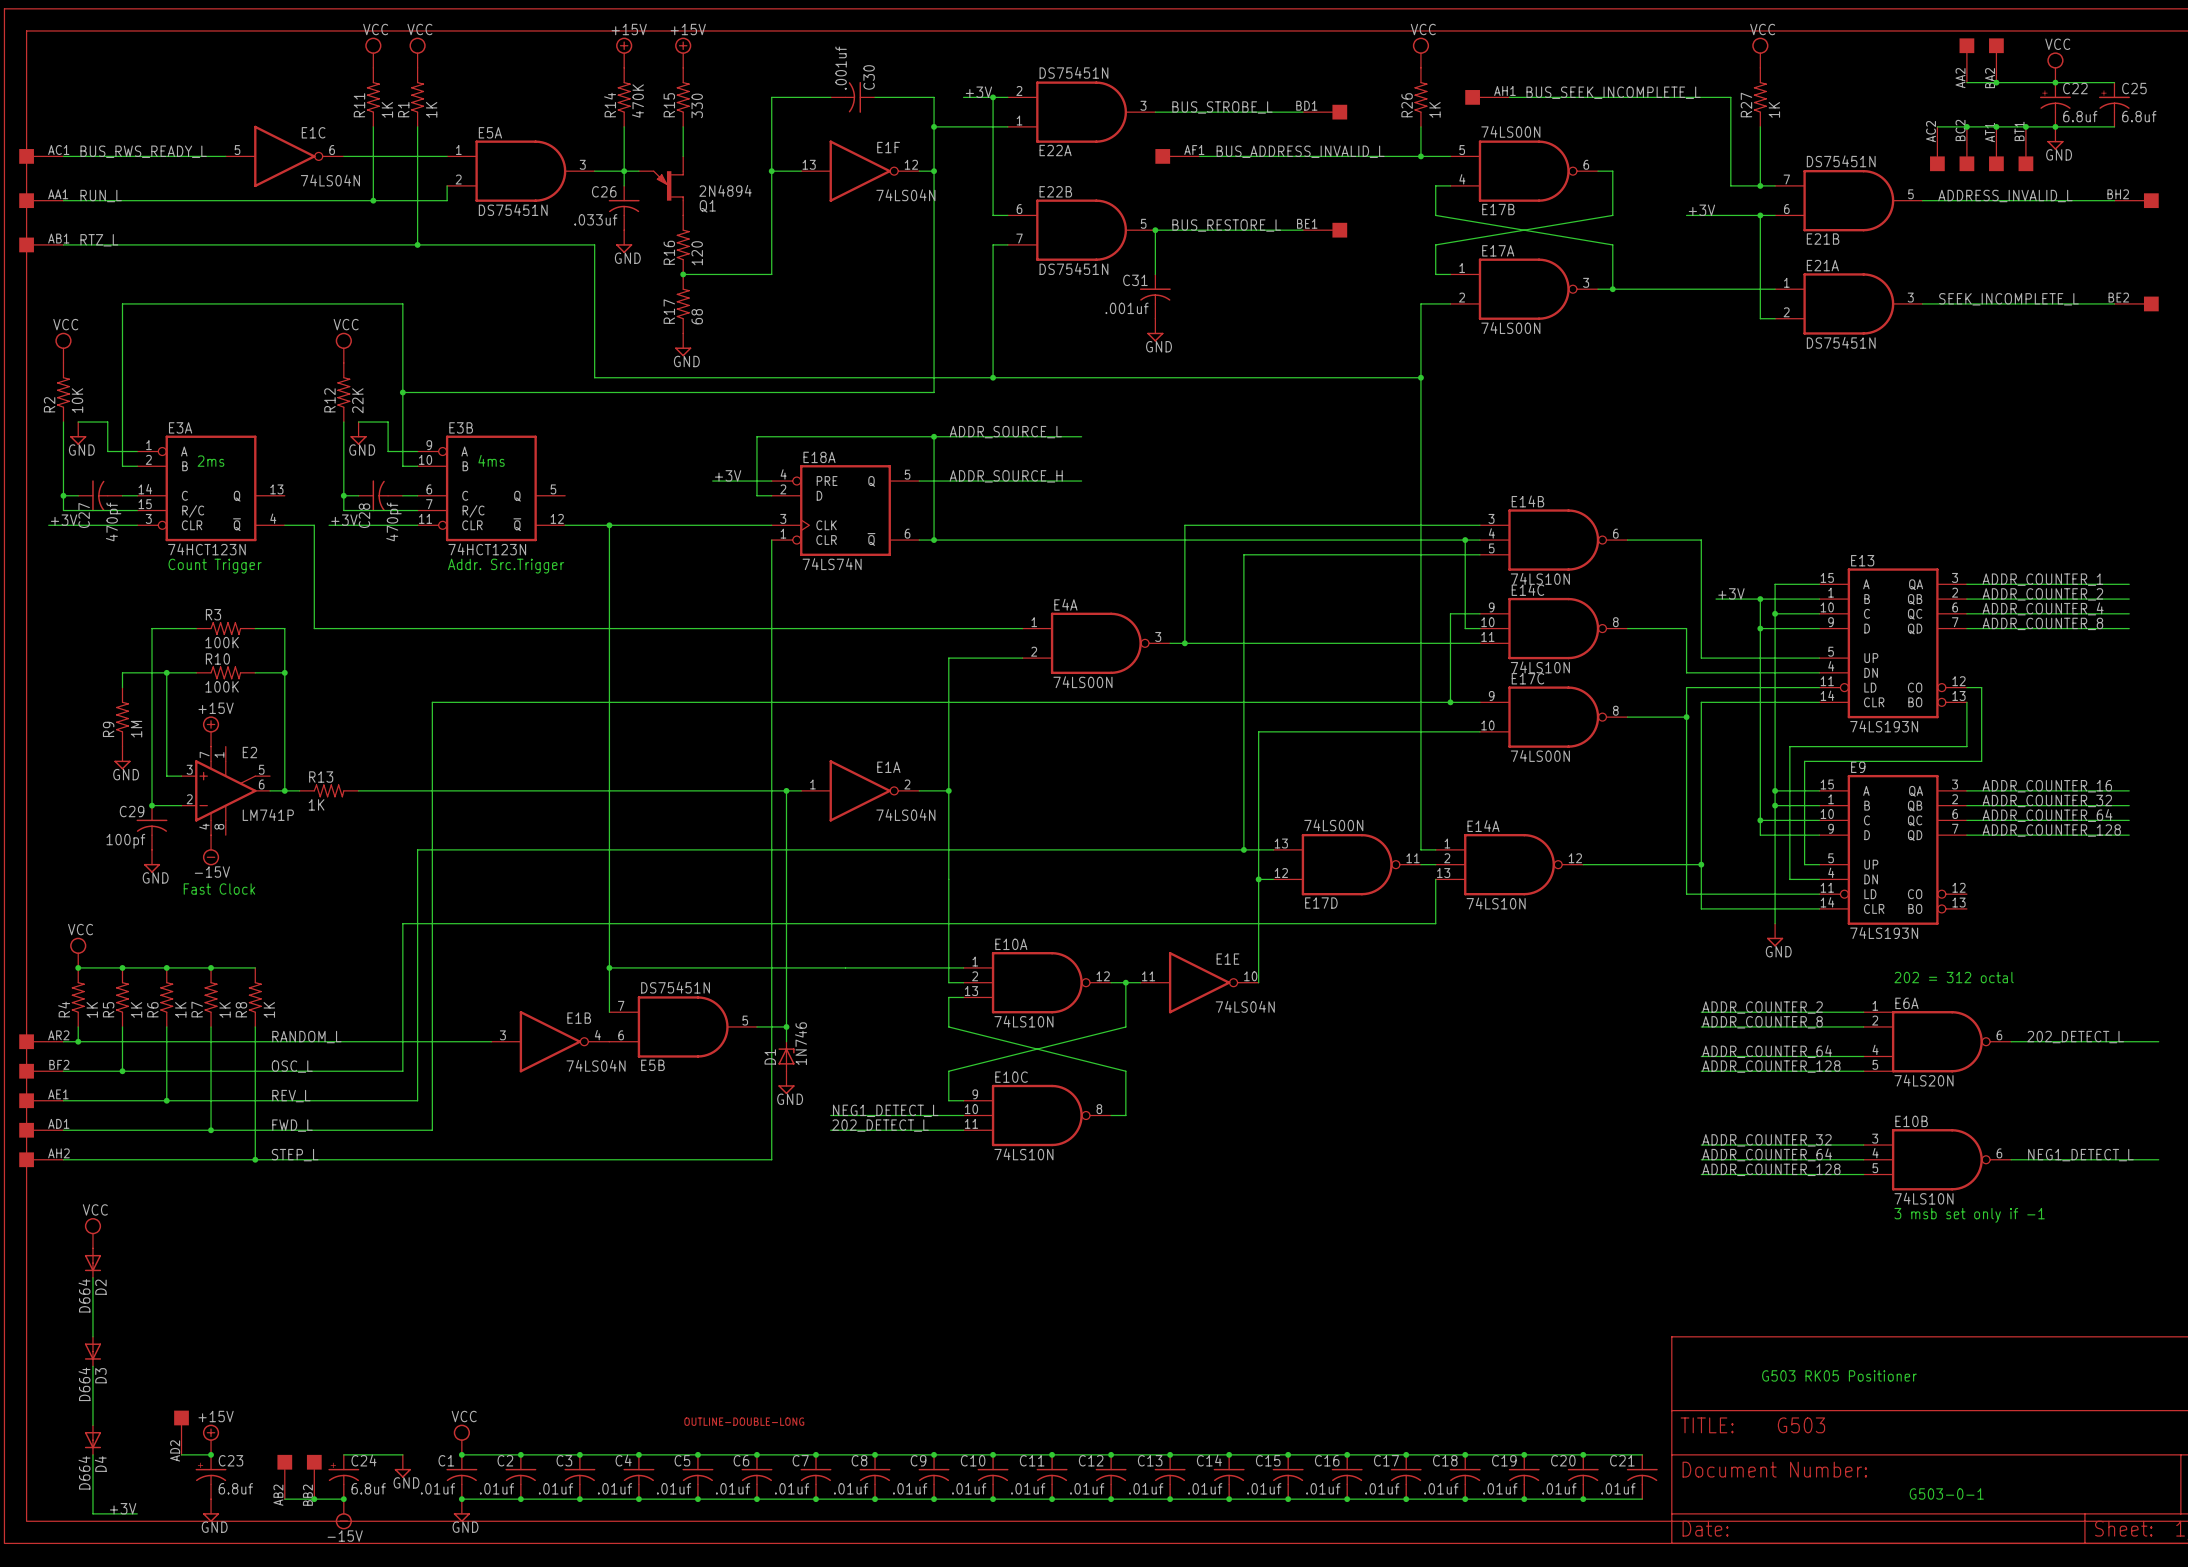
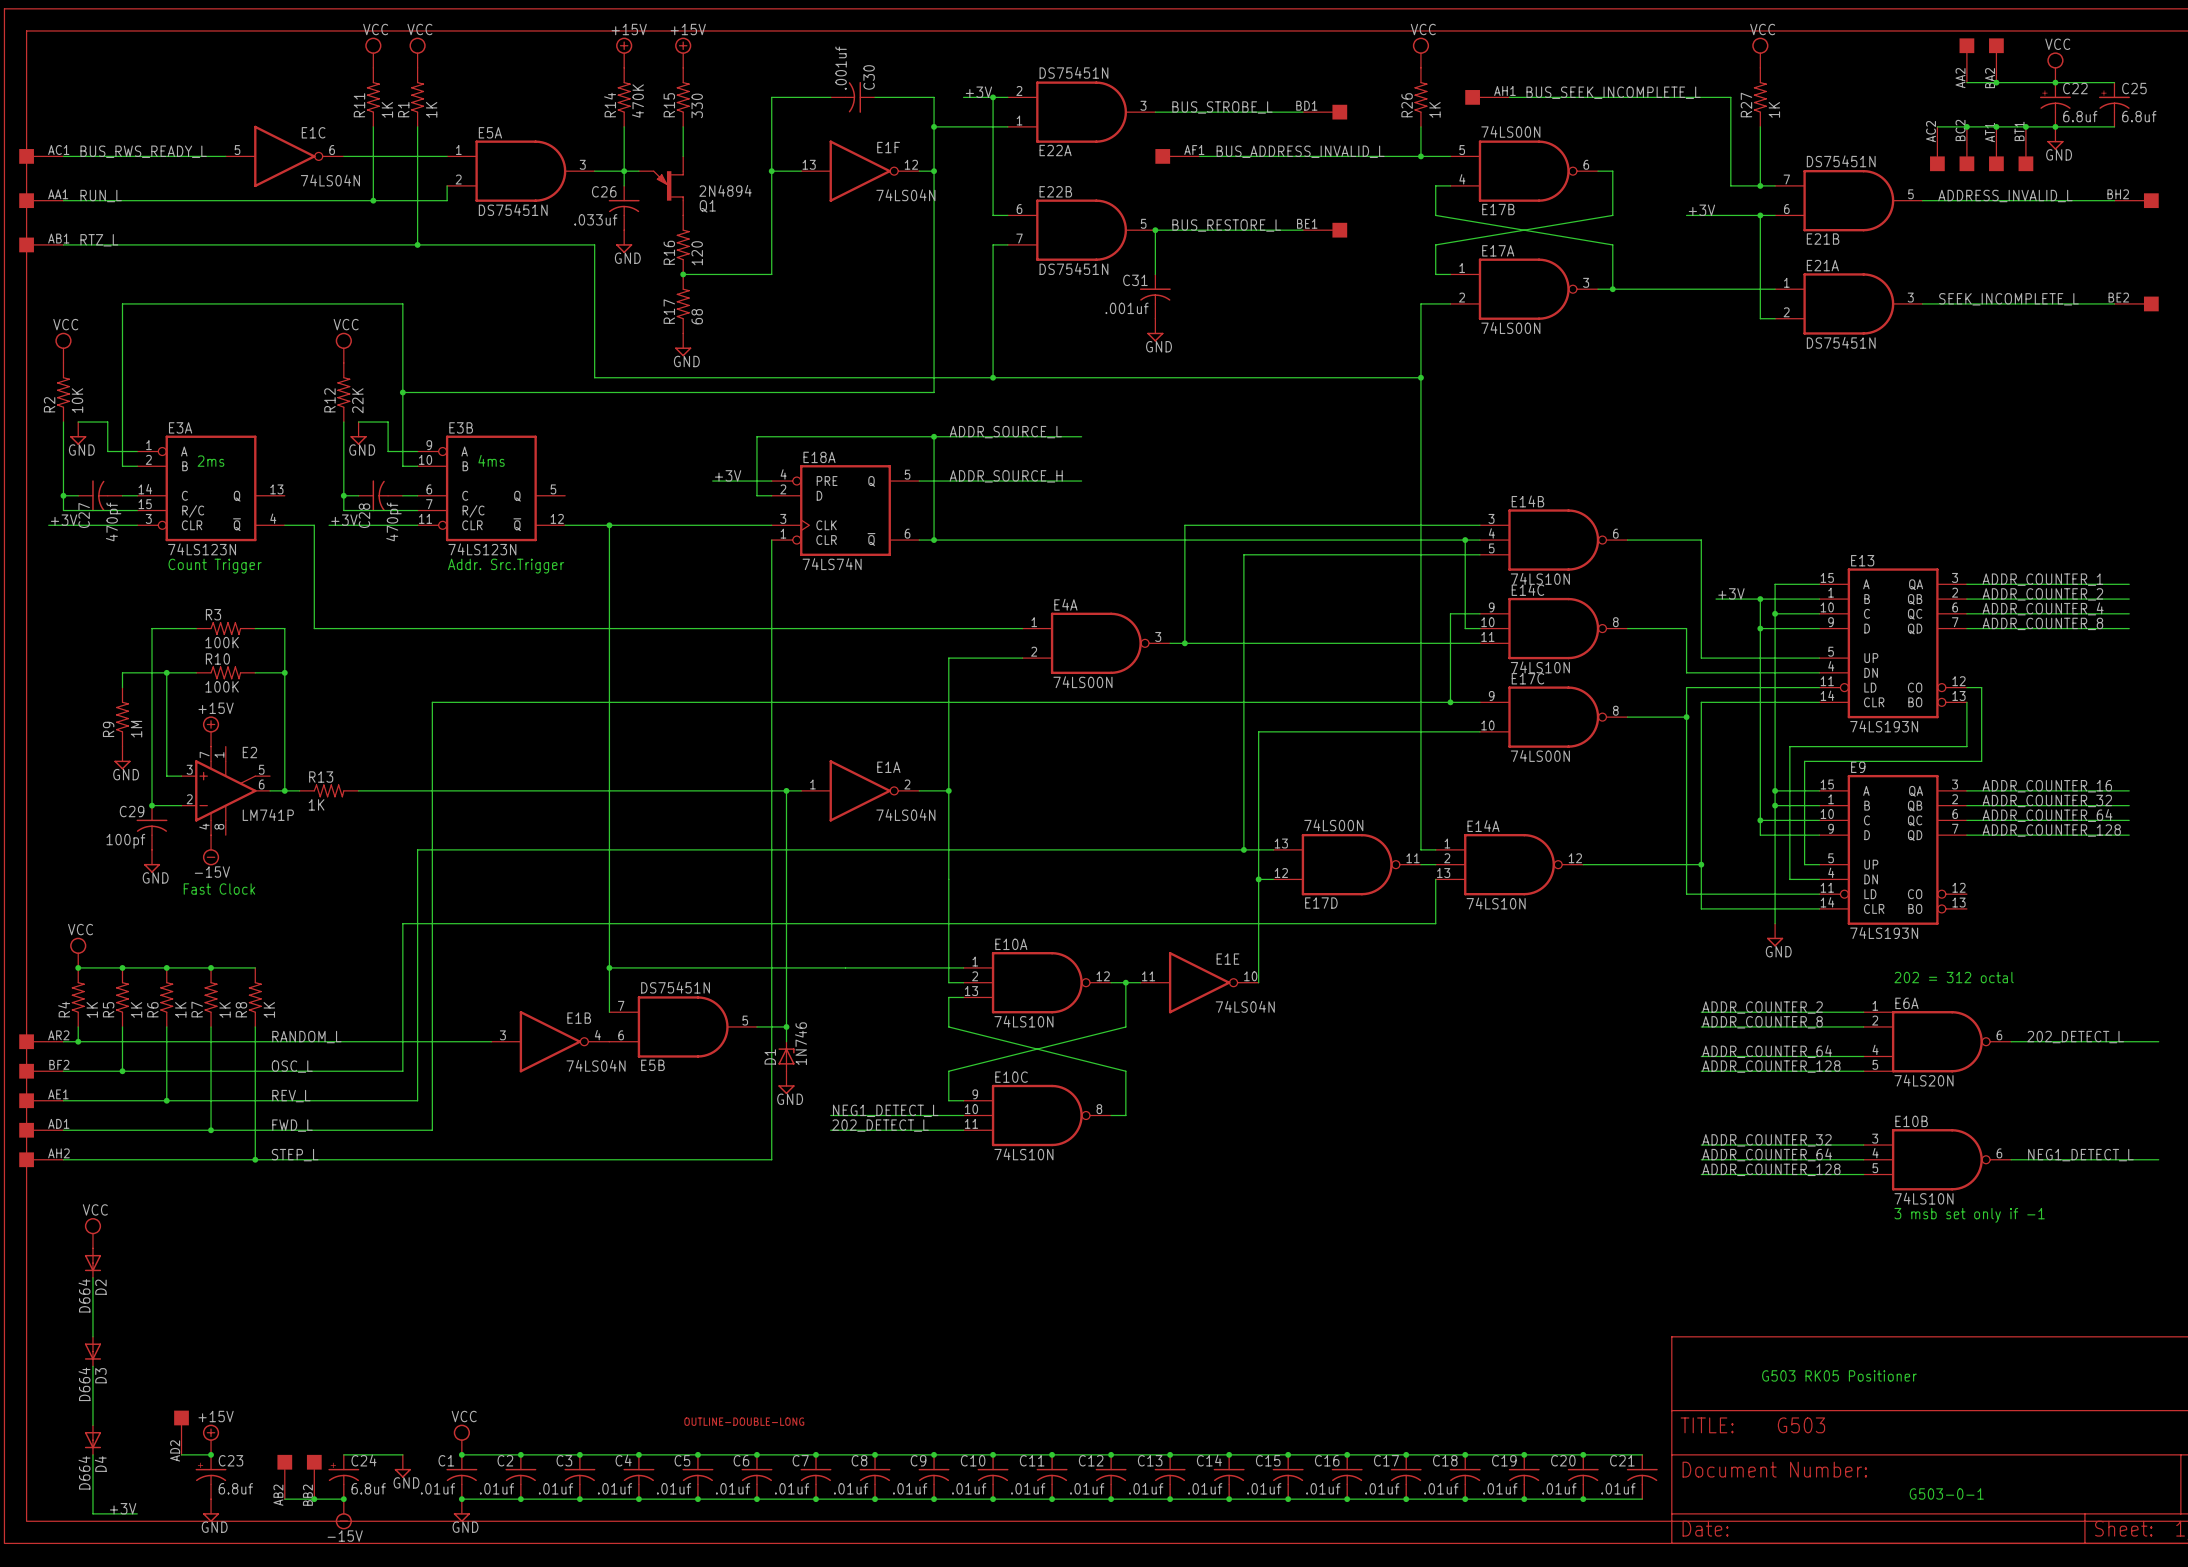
E3A value: 74HCT123N (206, 549) -> 74LS123N (202, 549)
E3B value: 74HCT123N (487, 549) -> 74LS123N (482, 549)

